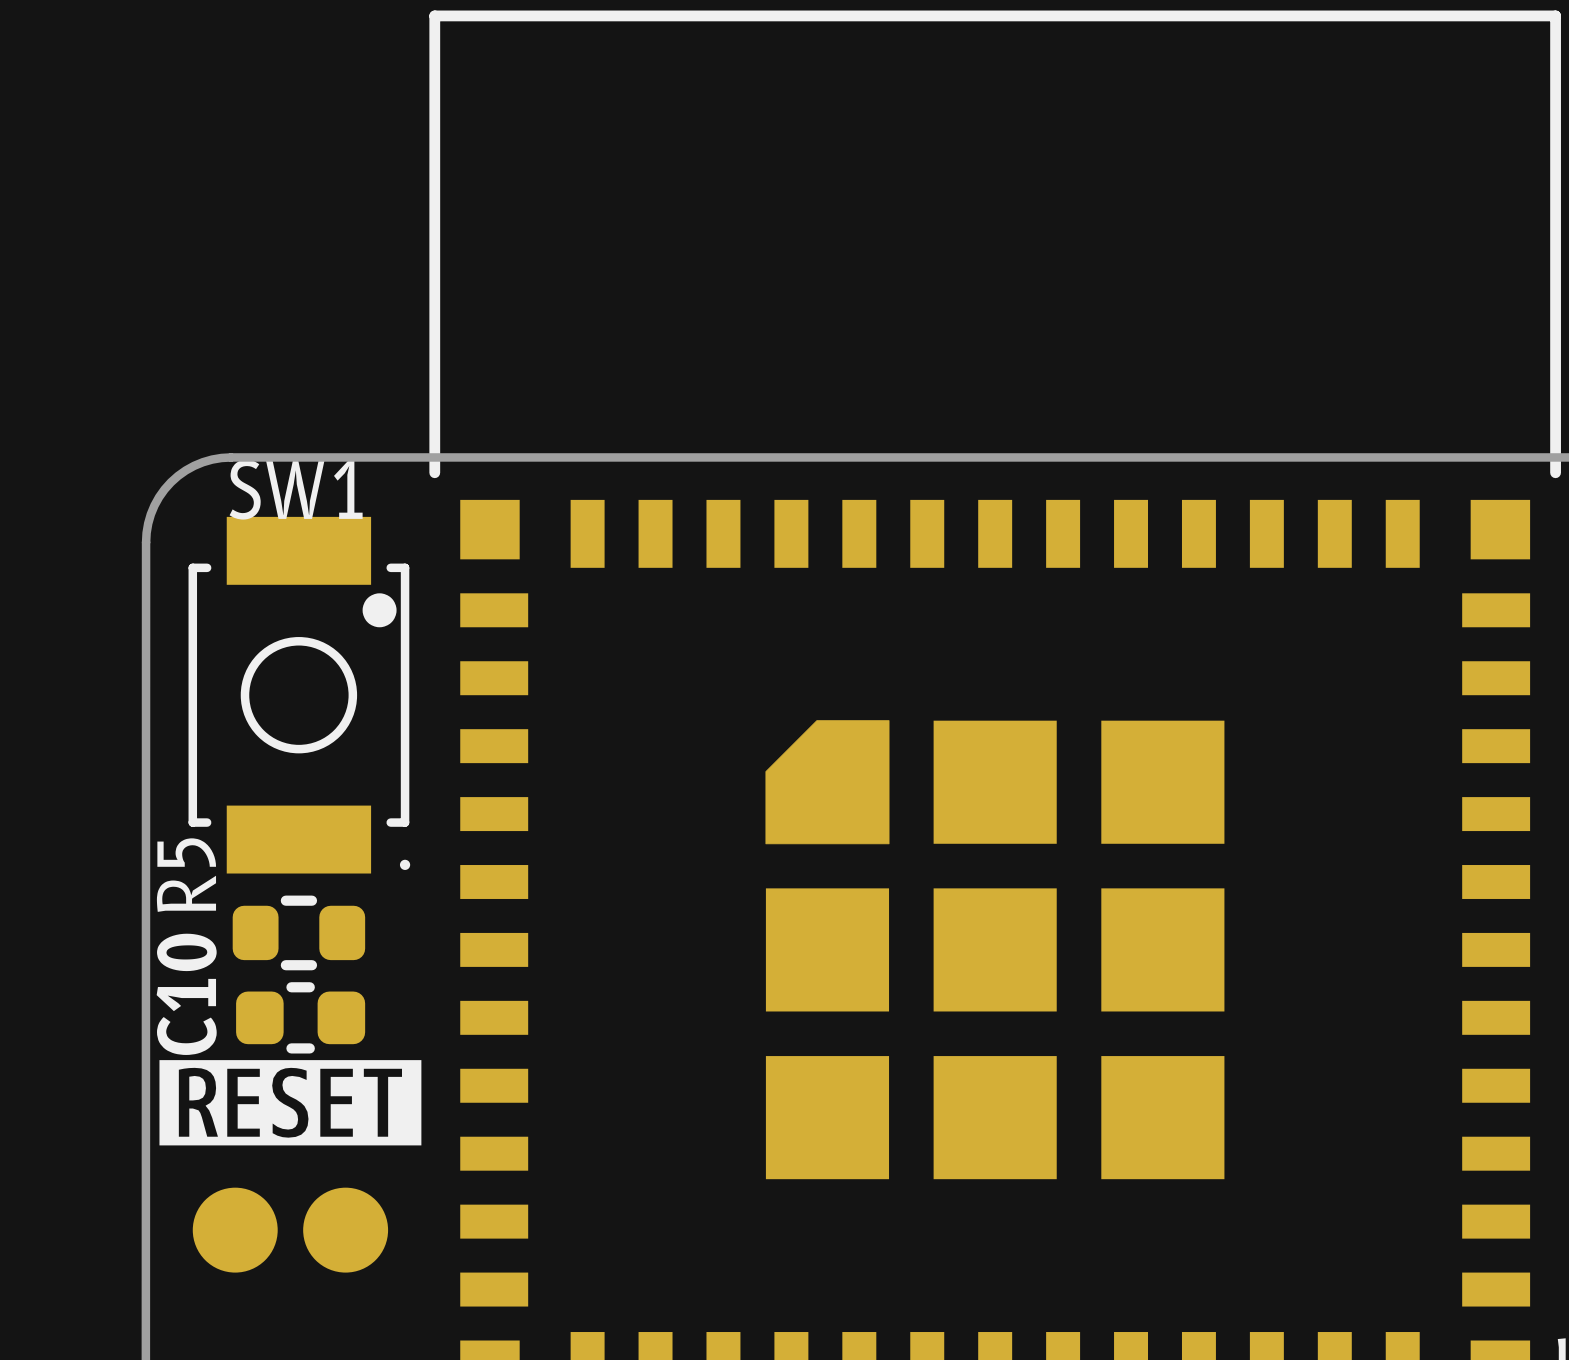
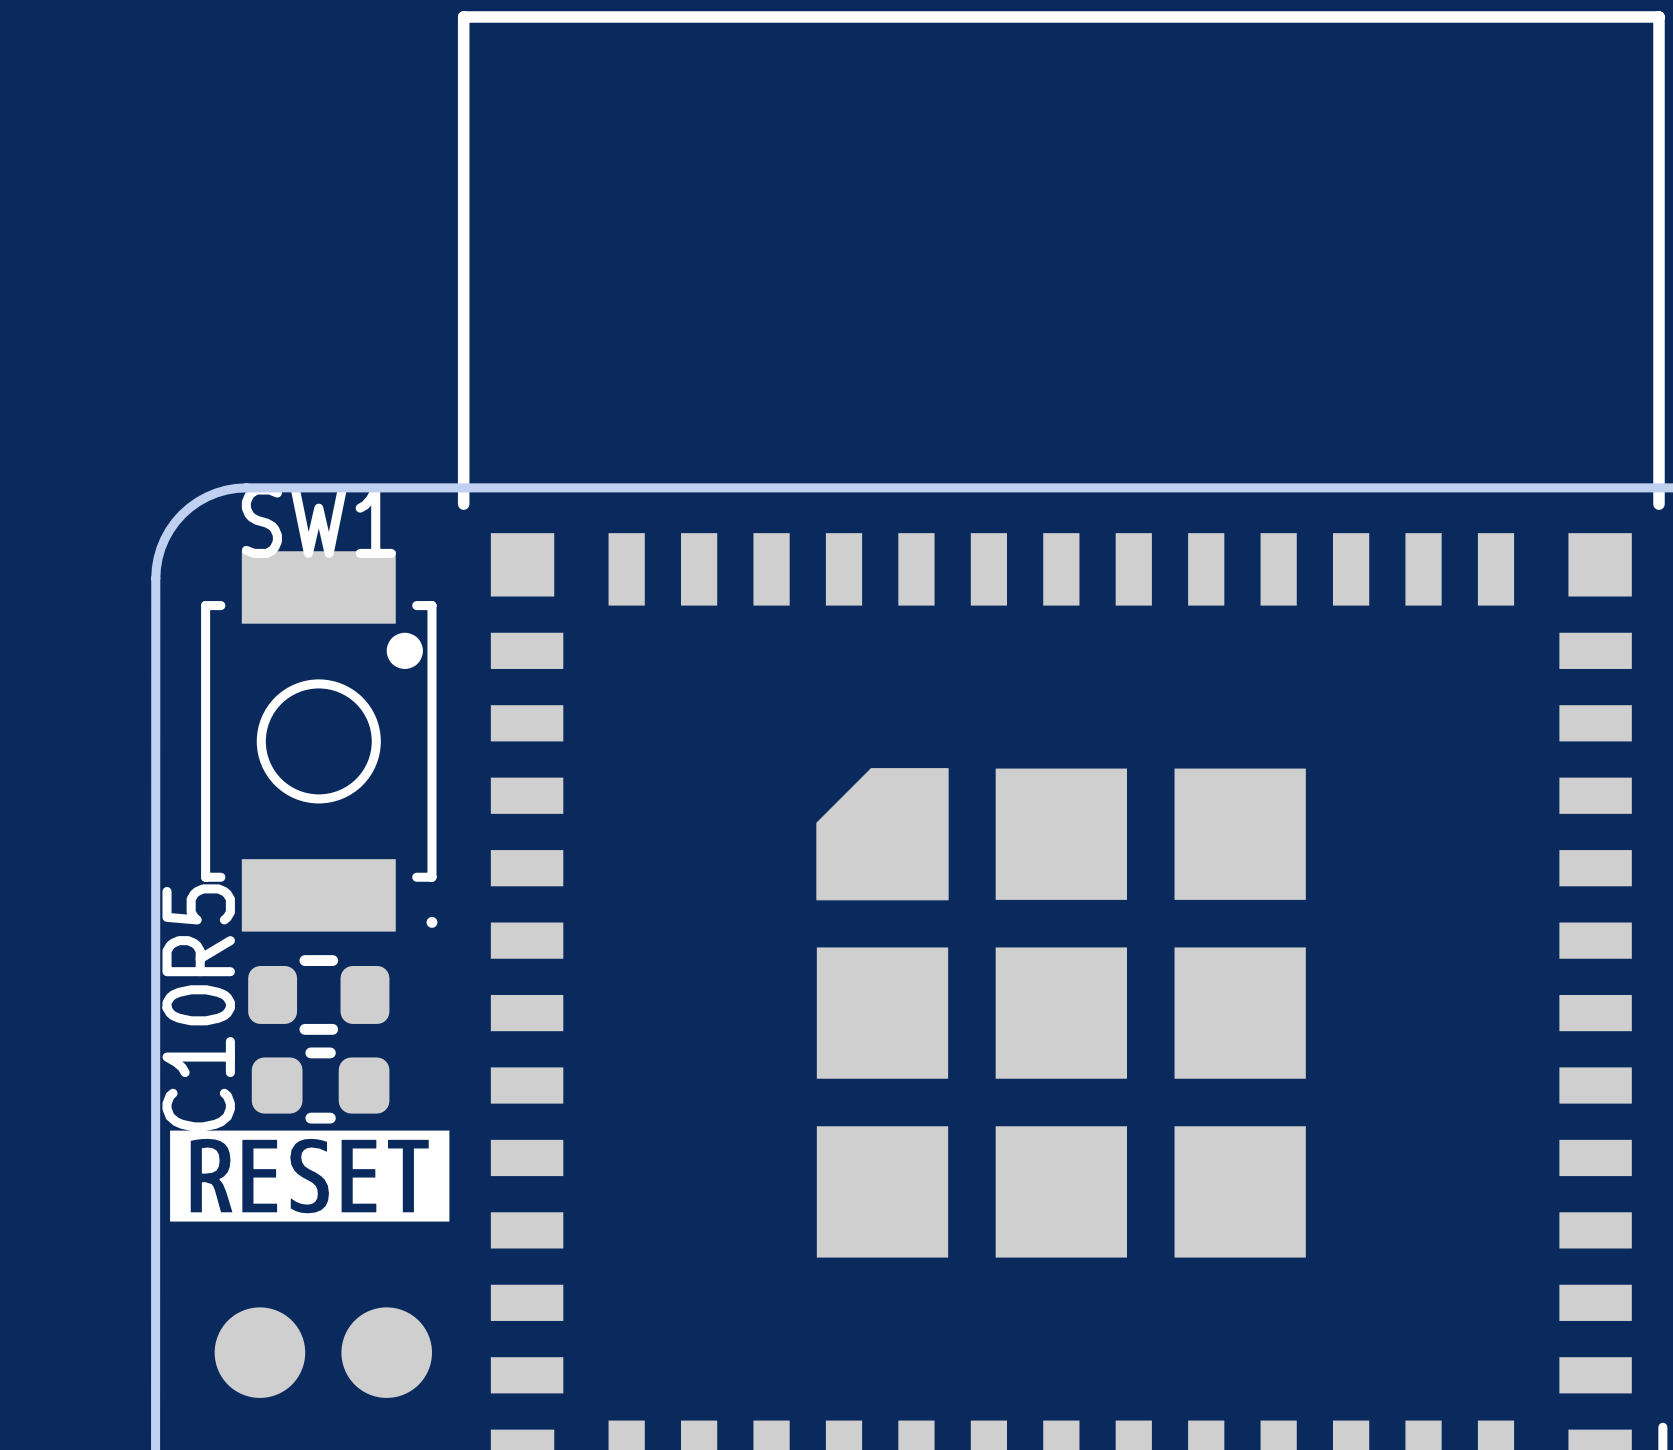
part position: (235, 1230) -> (259, 1352)
part position: (345, 1230) -> (386, 1352)

